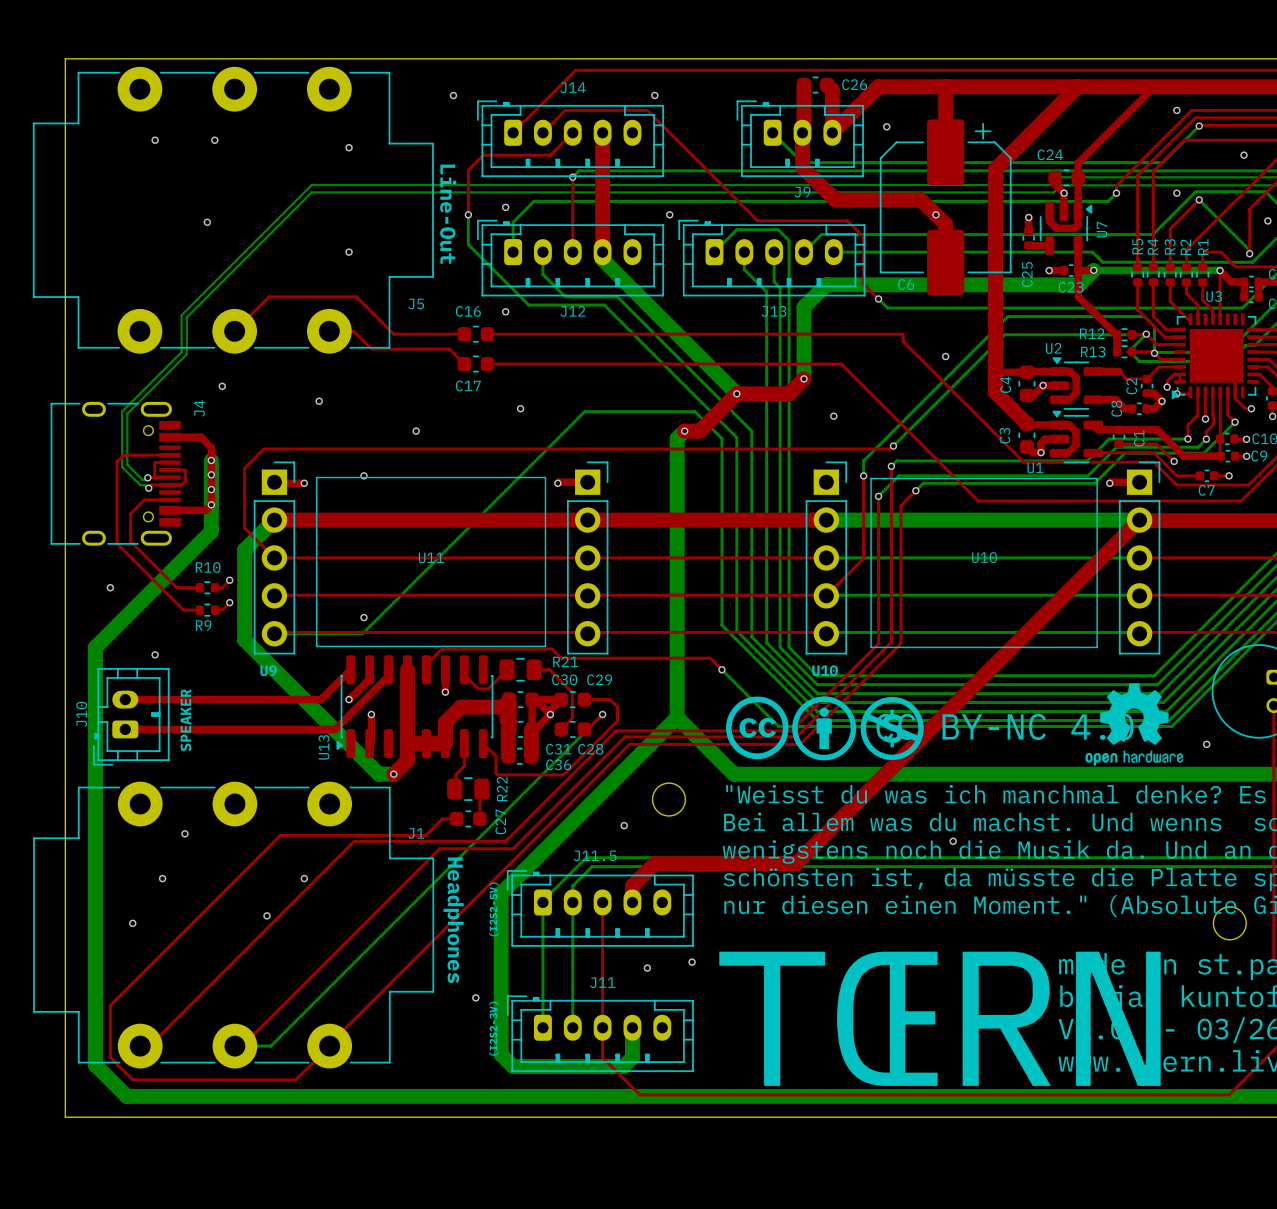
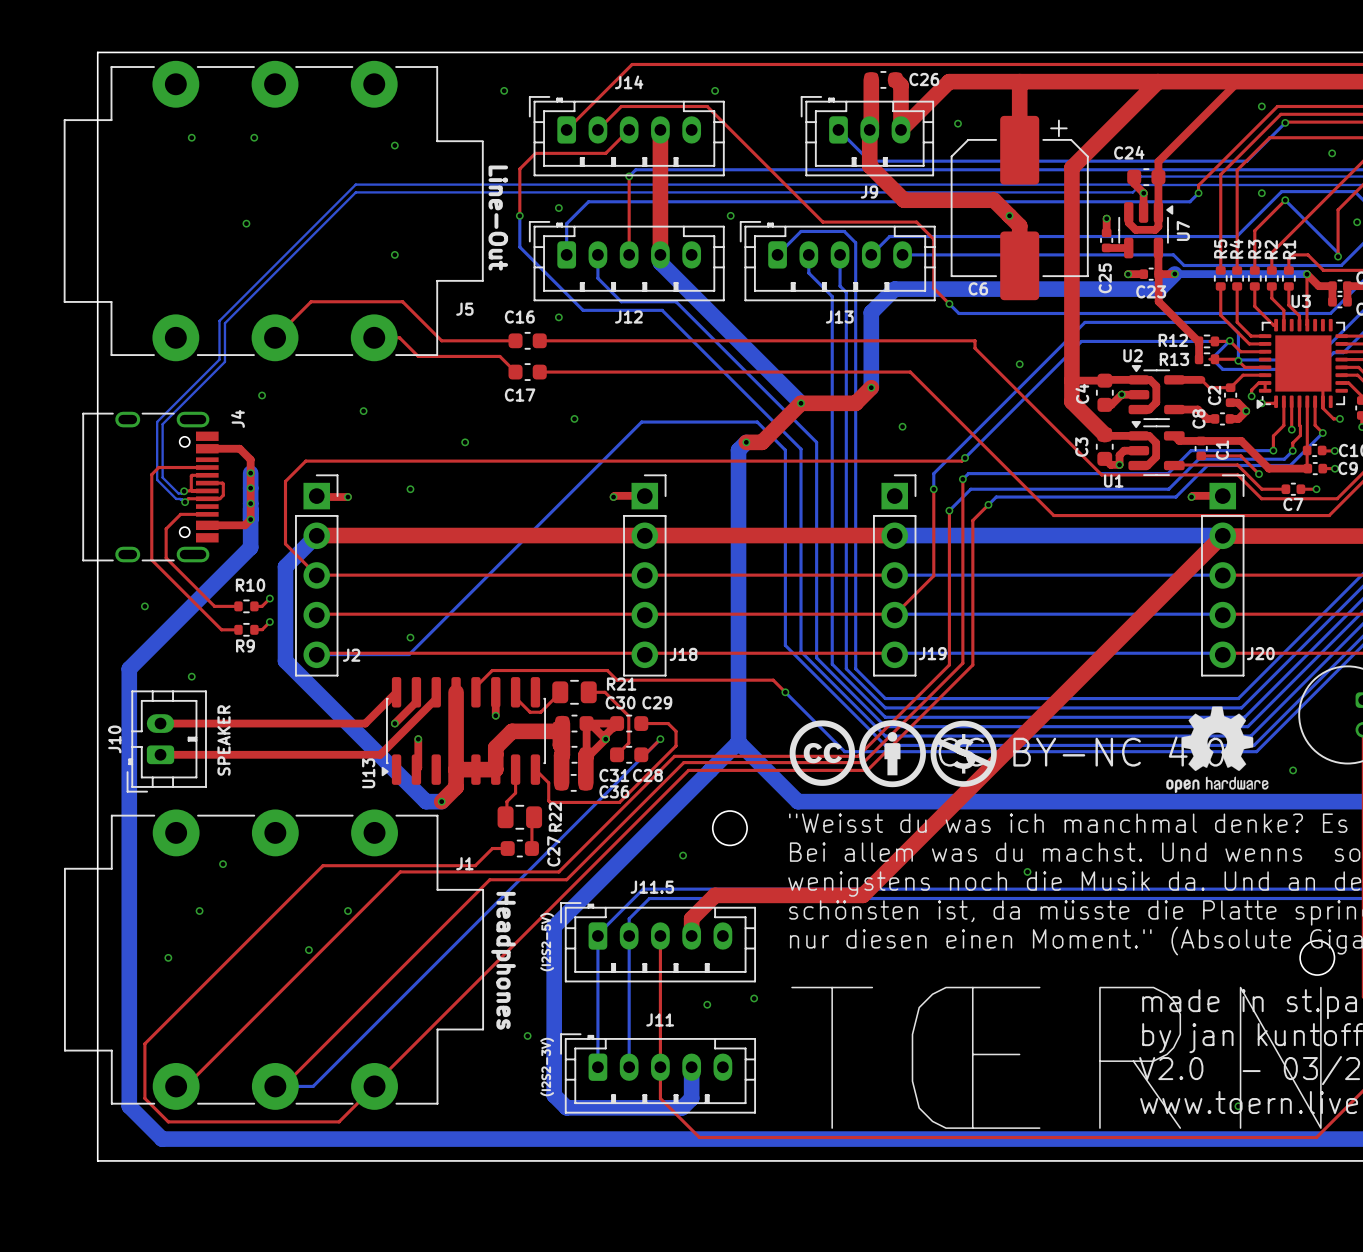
line: (316, 477) (545, 477) (545, 646) (316, 646) (316, 477) -> none
line: (871, 478) (1097, 478) (1097, 647) (871, 647) (871, 478) -> none
U11: (431, 557) -> none
U10: (982, 557) -> none
J2: none -> (316, 575)
J18: none -> (644, 575)
J19: none -> (894, 575)
J20: none -> (1222, 575)
text: U9 (268, 670) -> none
text: U10 (825, 670) -> none

